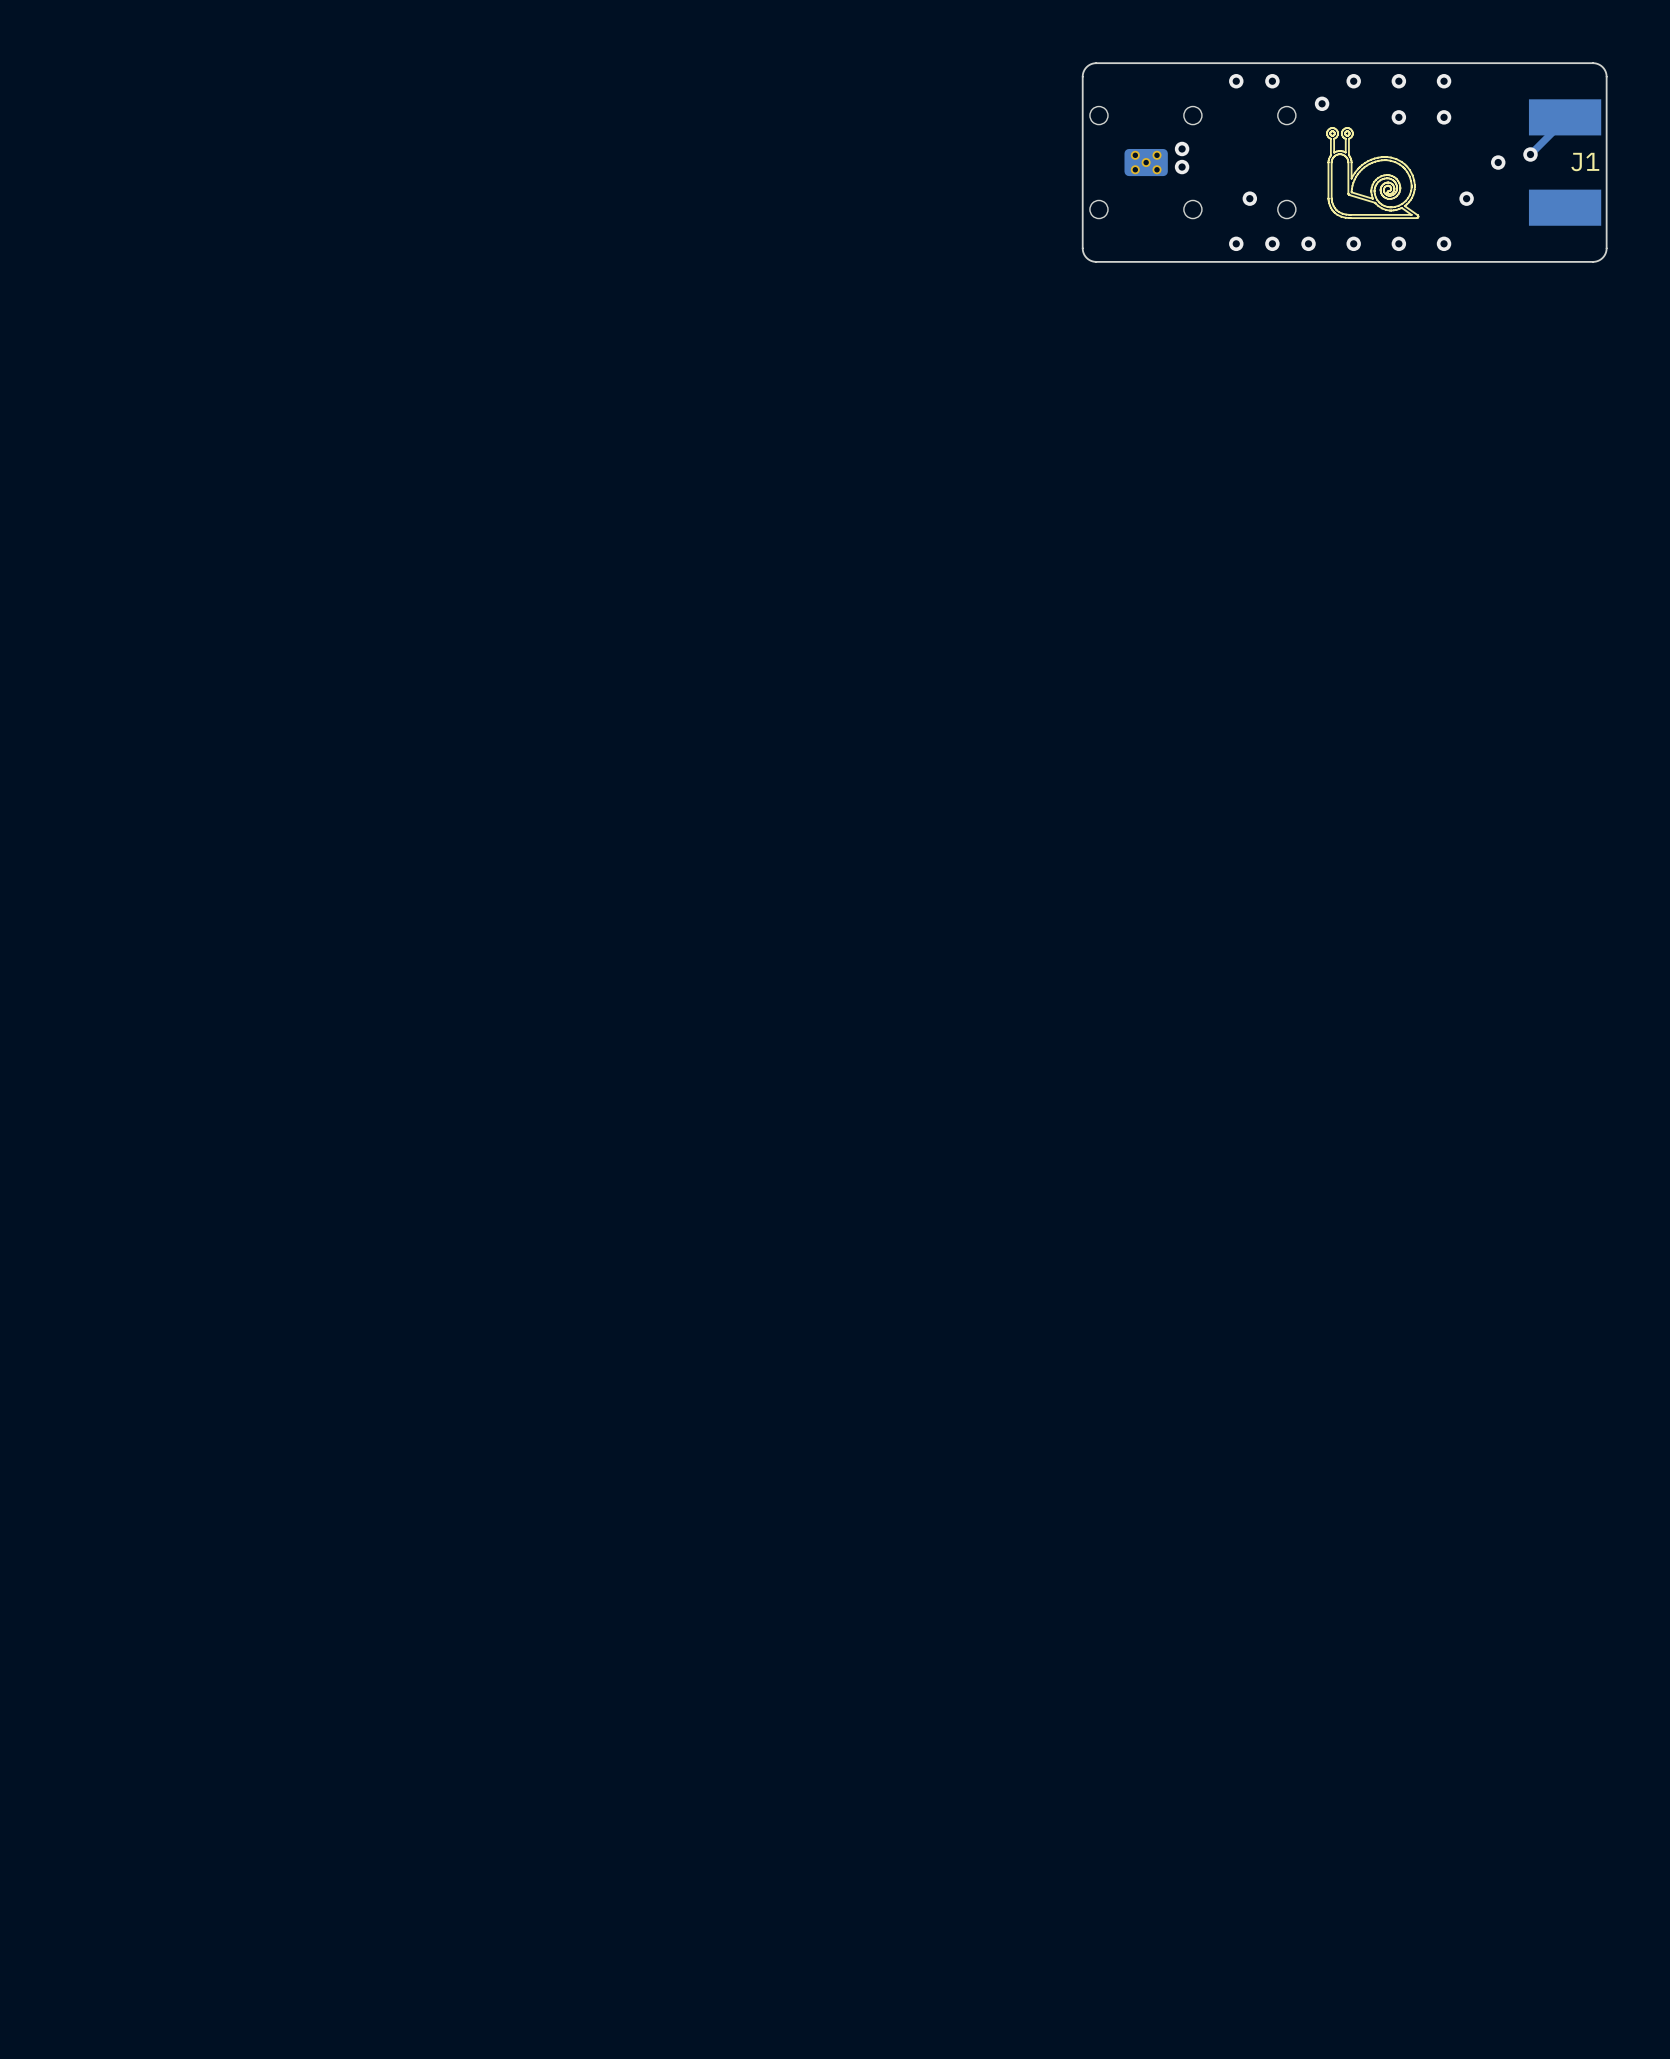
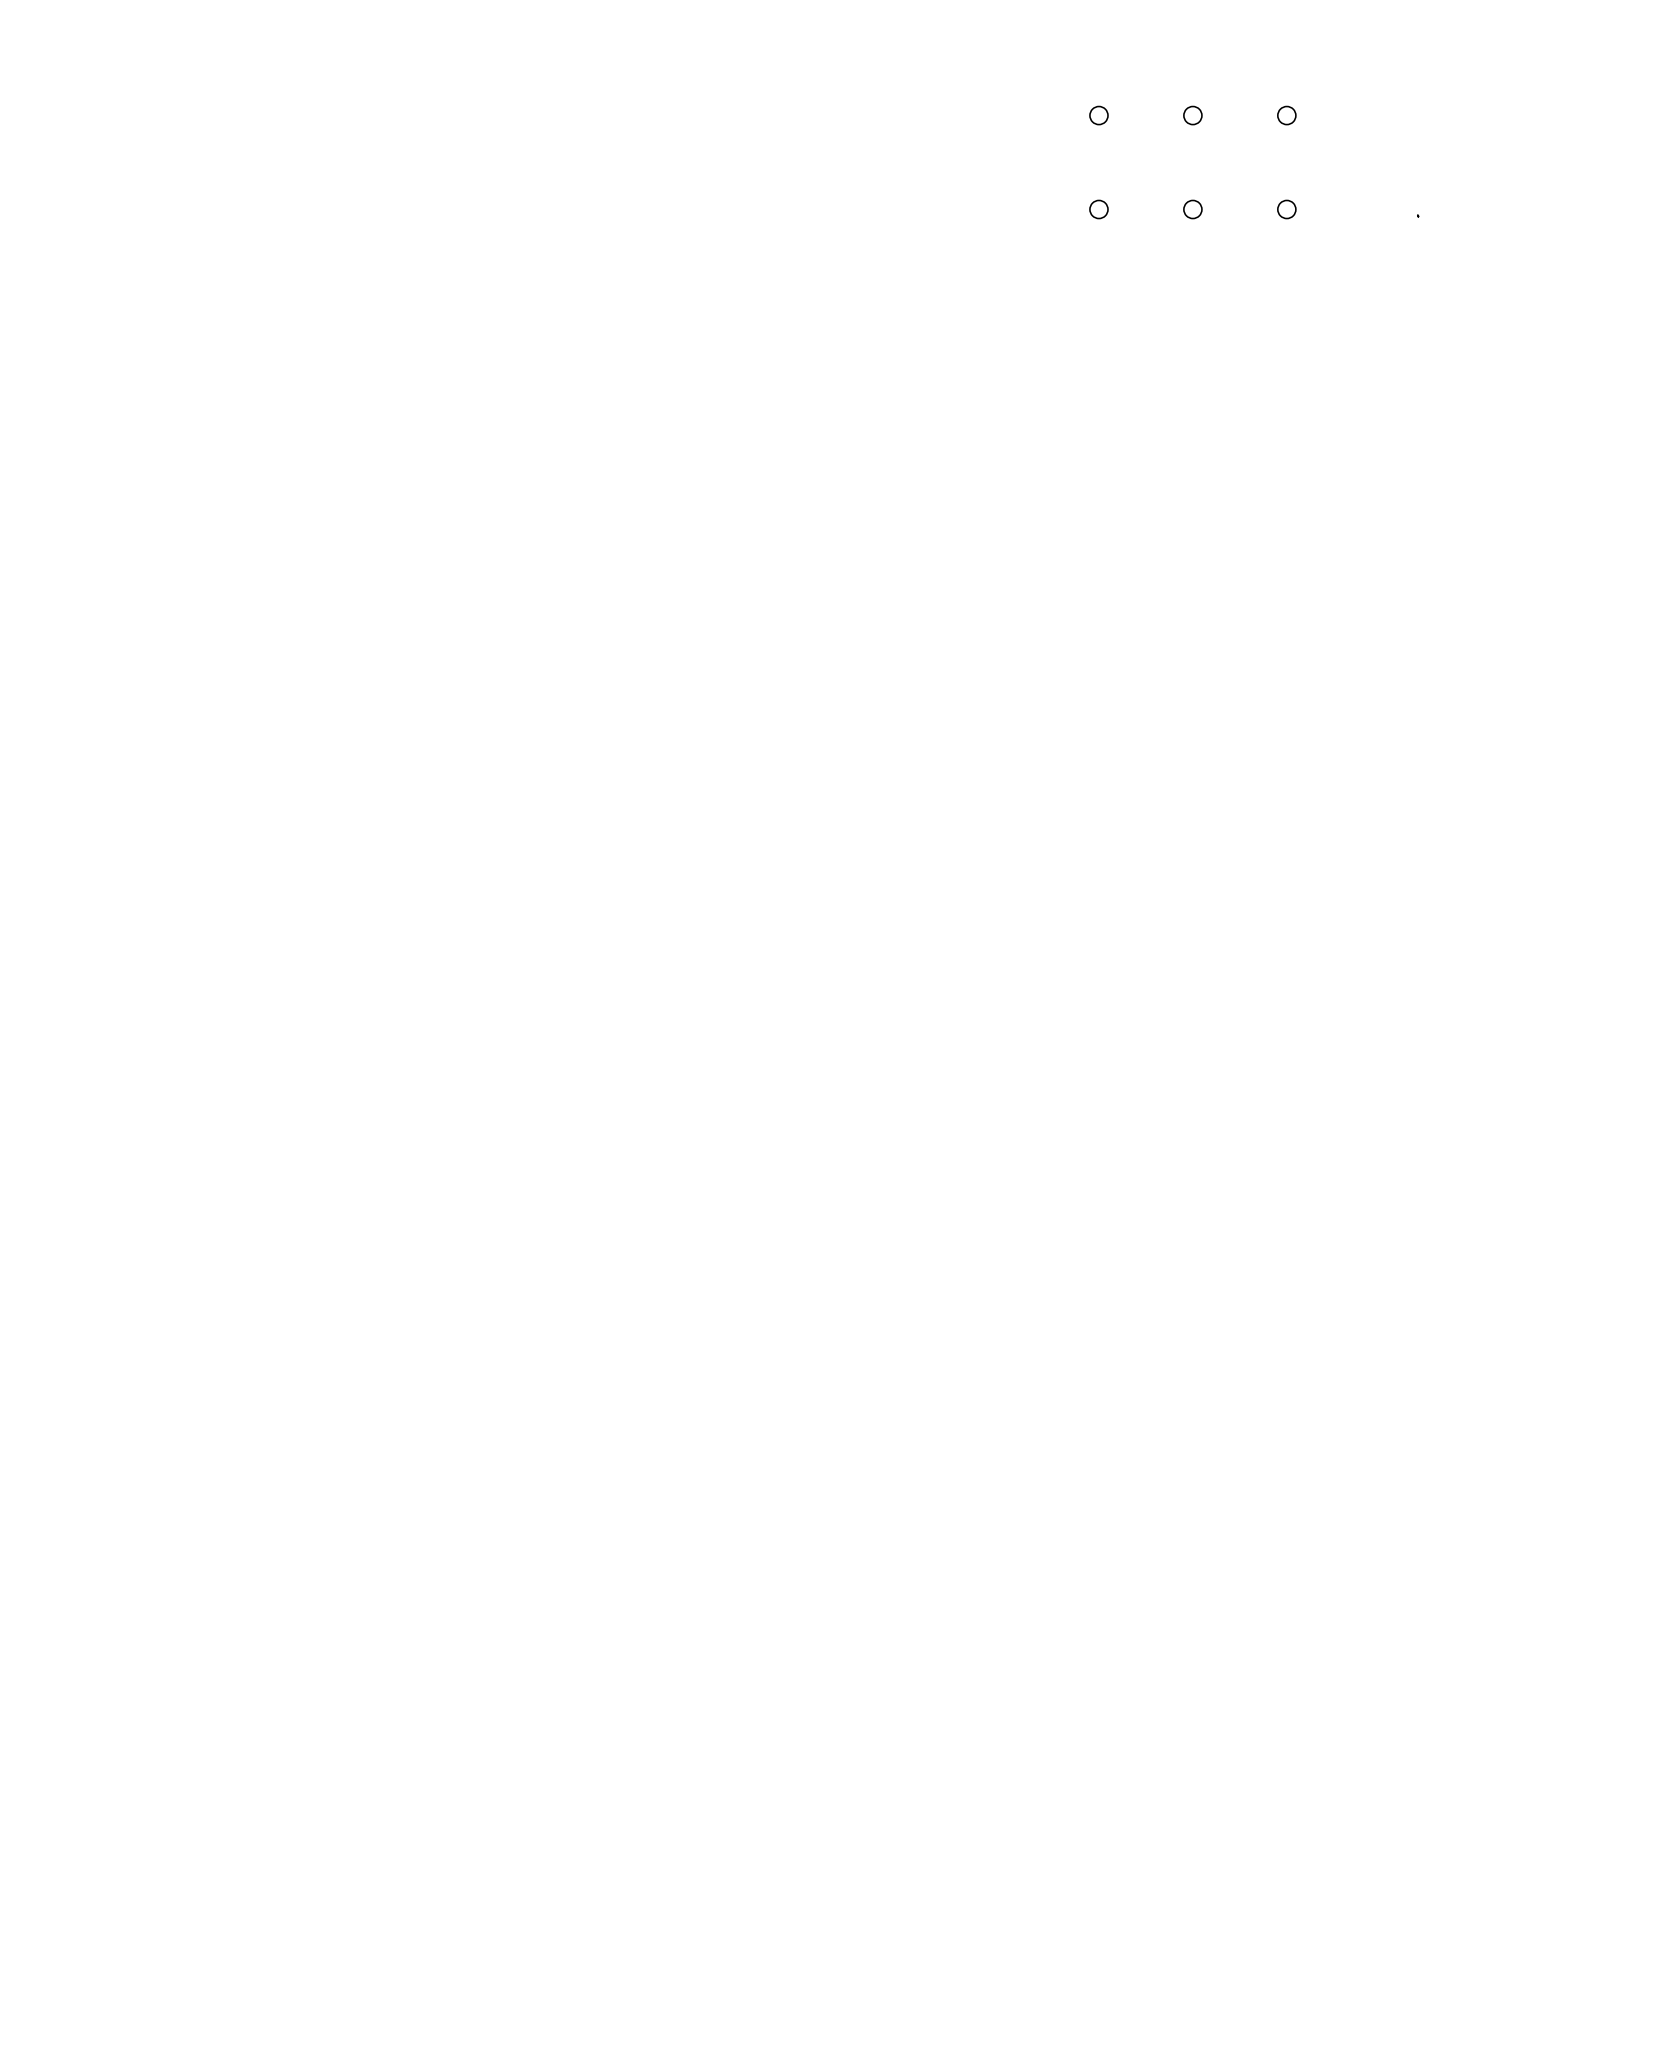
board edge: (1593, 63) (1091, 64) (1085, 68) (1082, 76) (1083, 253) (1088, 259) (1096, 261) (1598, 260) (1603, 256) (1606, 248) (1606, 76) (1602, 67) (1593, 63) -> none
via: (1236, 81) -> none
via: (1272, 81) -> none
via: (1353, 81) -> none
via: (1398, 81) -> none
via: (1444, 81) -> none
via: (1322, 103) -> none
via: (1398, 117) -> none
via: (1444, 117) -> none
track: (1559, 118) (1559, 125) (1530, 154) -> none
line: (1332, 131) (1334, 133) (1332, 135) (1330, 133) (1332, 131) -> none
line: (1347, 131) (1345, 133) (1347, 135) (1349, 133) (1347, 131) -> none
via: (1182, 148) -> none
via: (1530, 154) -> none
part: (1146, 162) -> none
via: (1498, 162) -> none
J1: (1565, 162) -> none
via: (1182, 167) -> none
line: (1390, 186) (1386, 186) (1383, 189) (1385, 194) (1389, 195) (1396, 191) (1395, 182) (1389, 178) (1380, 180) (1374, 188) (1375, 197) (1384, 206) (1398, 205) (1405, 201) (1410, 194) (1411, 185) (1409, 176) (1403, 166) (1395, 162) (1378, 160) (1369, 164) (1359, 171) (1353, 182) (1351, 192) (1372, 198) (1371, 190) (1374, 182) (1381, 176) (1387, 175) (1396, 179) (1400, 188) (1395, 197) (1386, 198) (1380, 190) (1385, 183) (1390, 183) (1394, 188) (1391, 193) (1387, 192) -> none
line: (1390, 186) (1391, 189) (1387, 192) -> none
line: (1349, 195) (1375, 202) -> none
line: (1349, 195) (1348, 160) (1344, 155) (1338, 154) (1331, 160) (1331, 198) -> none
via: (1249, 198) -> none
line: (1331, 198) (1336, 209) (1346, 214) (1411, 214) (1402, 208) -> none
via: (1466, 198) -> none
line: (1375, 202) (1386, 209) (1401, 207) -> none
line: (1417, 215) (1404, 206) (1412, 197) (1414, 187) (1412, 175) (1405, 164) (1391, 157) (1374, 158) (1359, 167) (1351, 178) (1348, 138) (1352, 135) (1352, 131) (1347, 128) (1342, 131) (1342, 135) (1345, 138) (1345, 152) (1339, 151) (1334, 152) (1334, 138) (1338, 132) (1334, 128) (1328, 129) (1327, 133) (1330, 138) (1330, 155) (1328, 162) (1328, 199) (1334, 212) (1349, 218) (1418, 217) -> none
via: (1236, 243) -> none
via: (1272, 243) -> none
via: (1308, 243) -> none
via: (1353, 243) -> none
via: (1398, 243) -> none
via: (1444, 243) -> none

